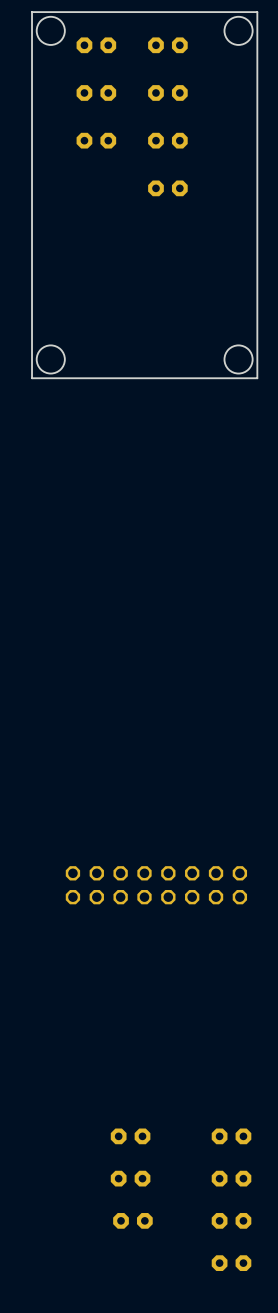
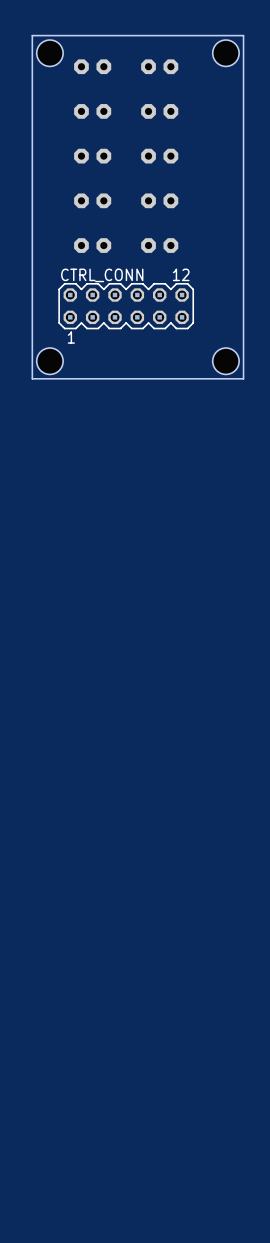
part: none -> (92, 200)
part: none -> (92, 245)
part: none -> (159, 245)
CTRL_CONN: none -> (126, 306)
part: (156, 885) -> none
part: (130, 1136) -> none
part: (231, 1136) -> none
part: (130, 1178) -> none
part: (231, 1178) -> none
part: (132, 1220) -> none
part: (231, 1220) -> none
part: (231, 1263) -> none

